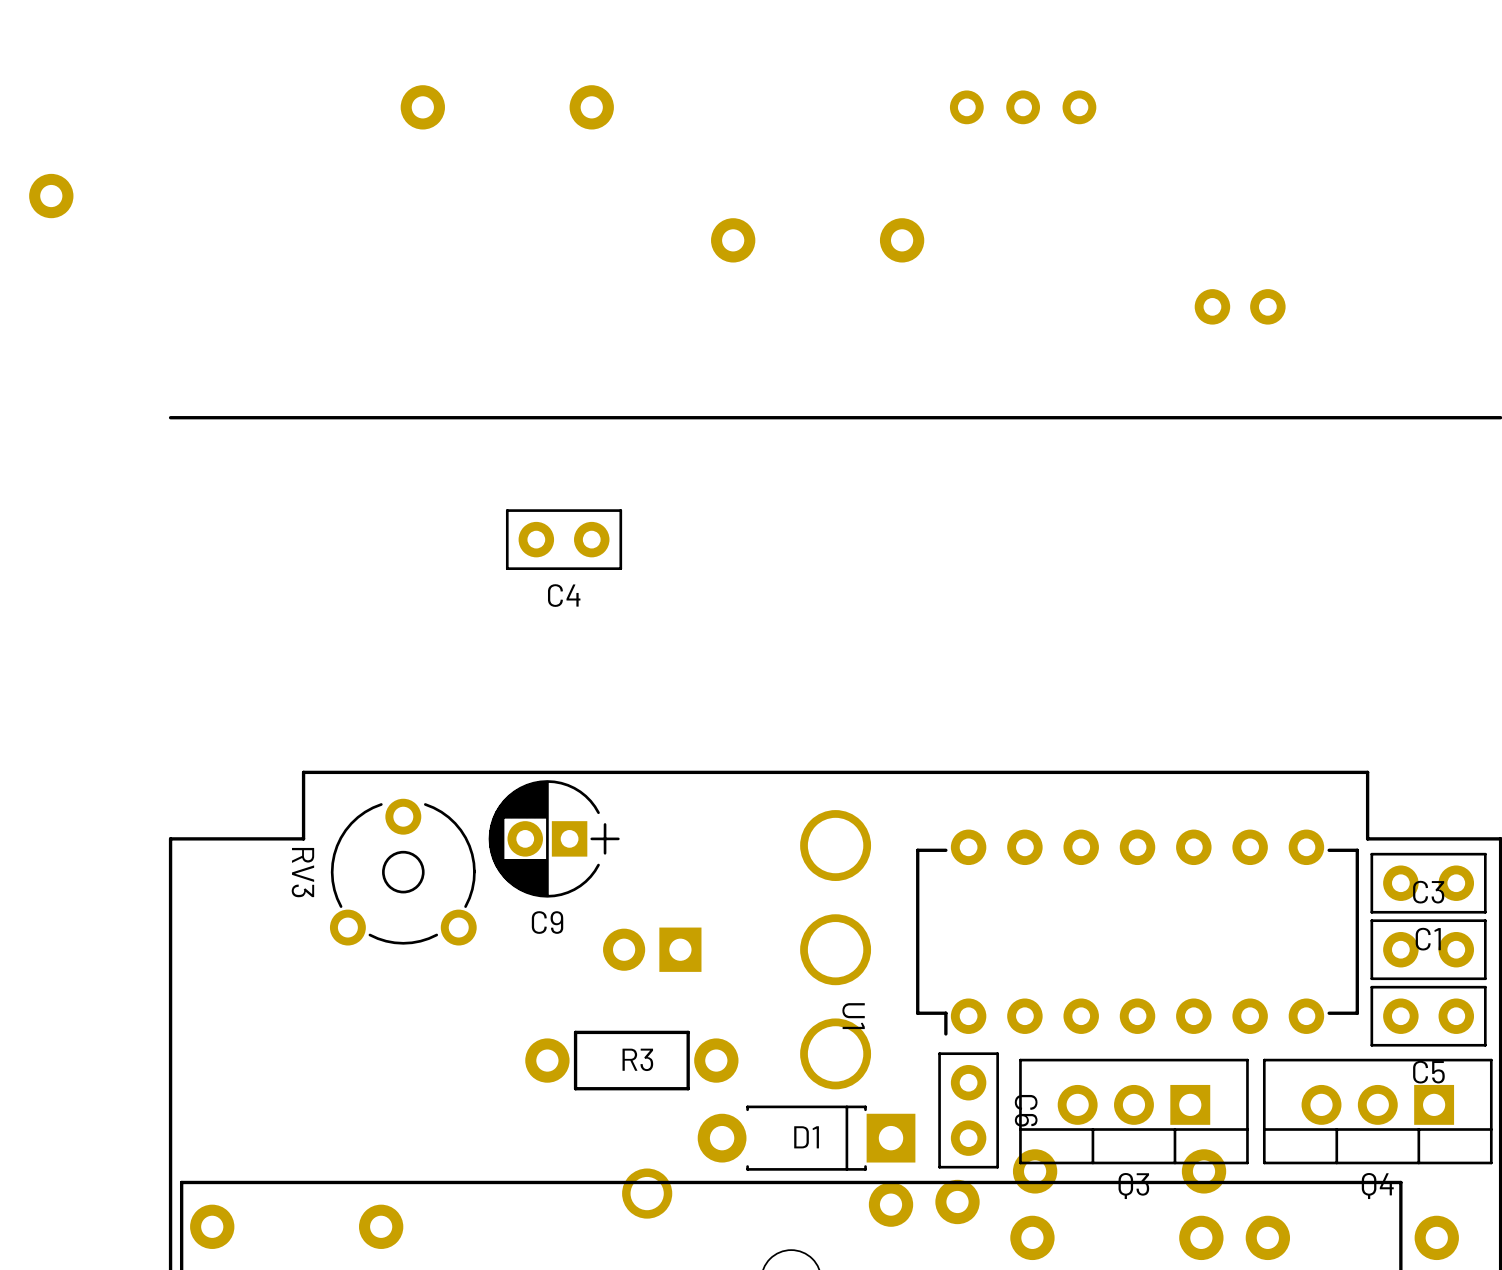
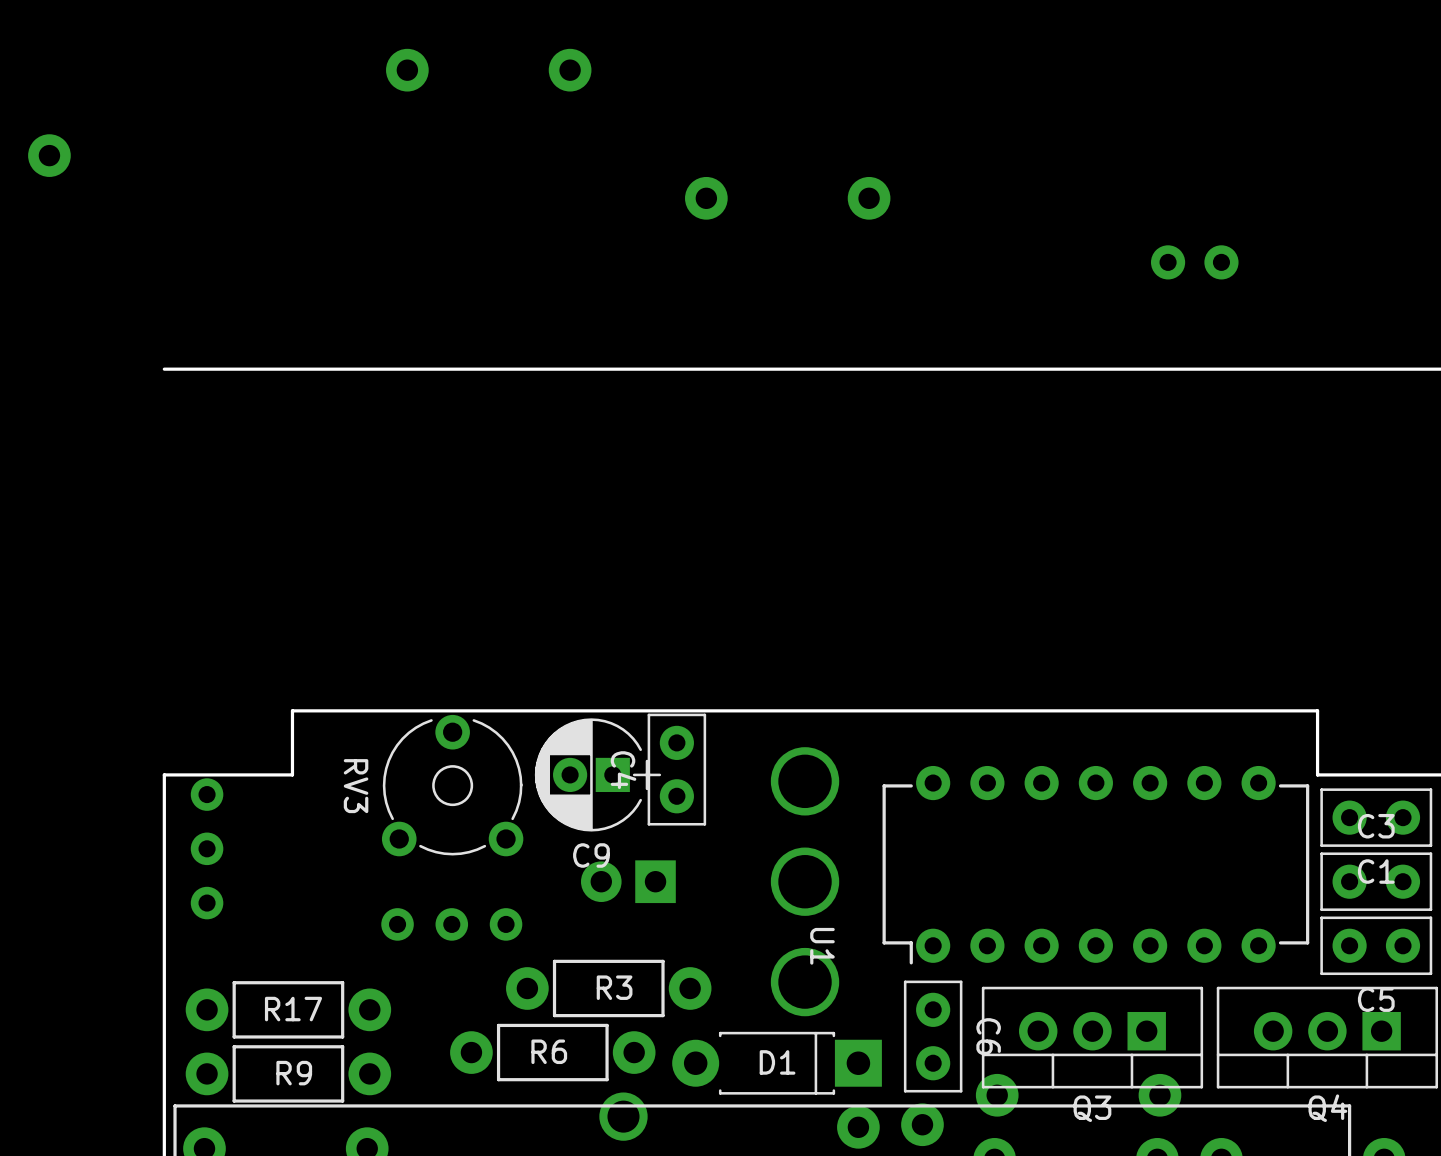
part: (1023, 107) -> none
C4 rotation: 0° (564, 539) -> 90° clockwise (676, 769)
C4 position: (564, 539) -> (676, 769)
C9 position: (554, 838) -> (597, 774)
RV3 position: (403, 872) -> (452, 785)
part: none -> (207, 848)
part: none -> (451, 924)
R17: none -> (288, 1009)
R6: none -> (552, 1052)
R9: none -> (288, 1073)

